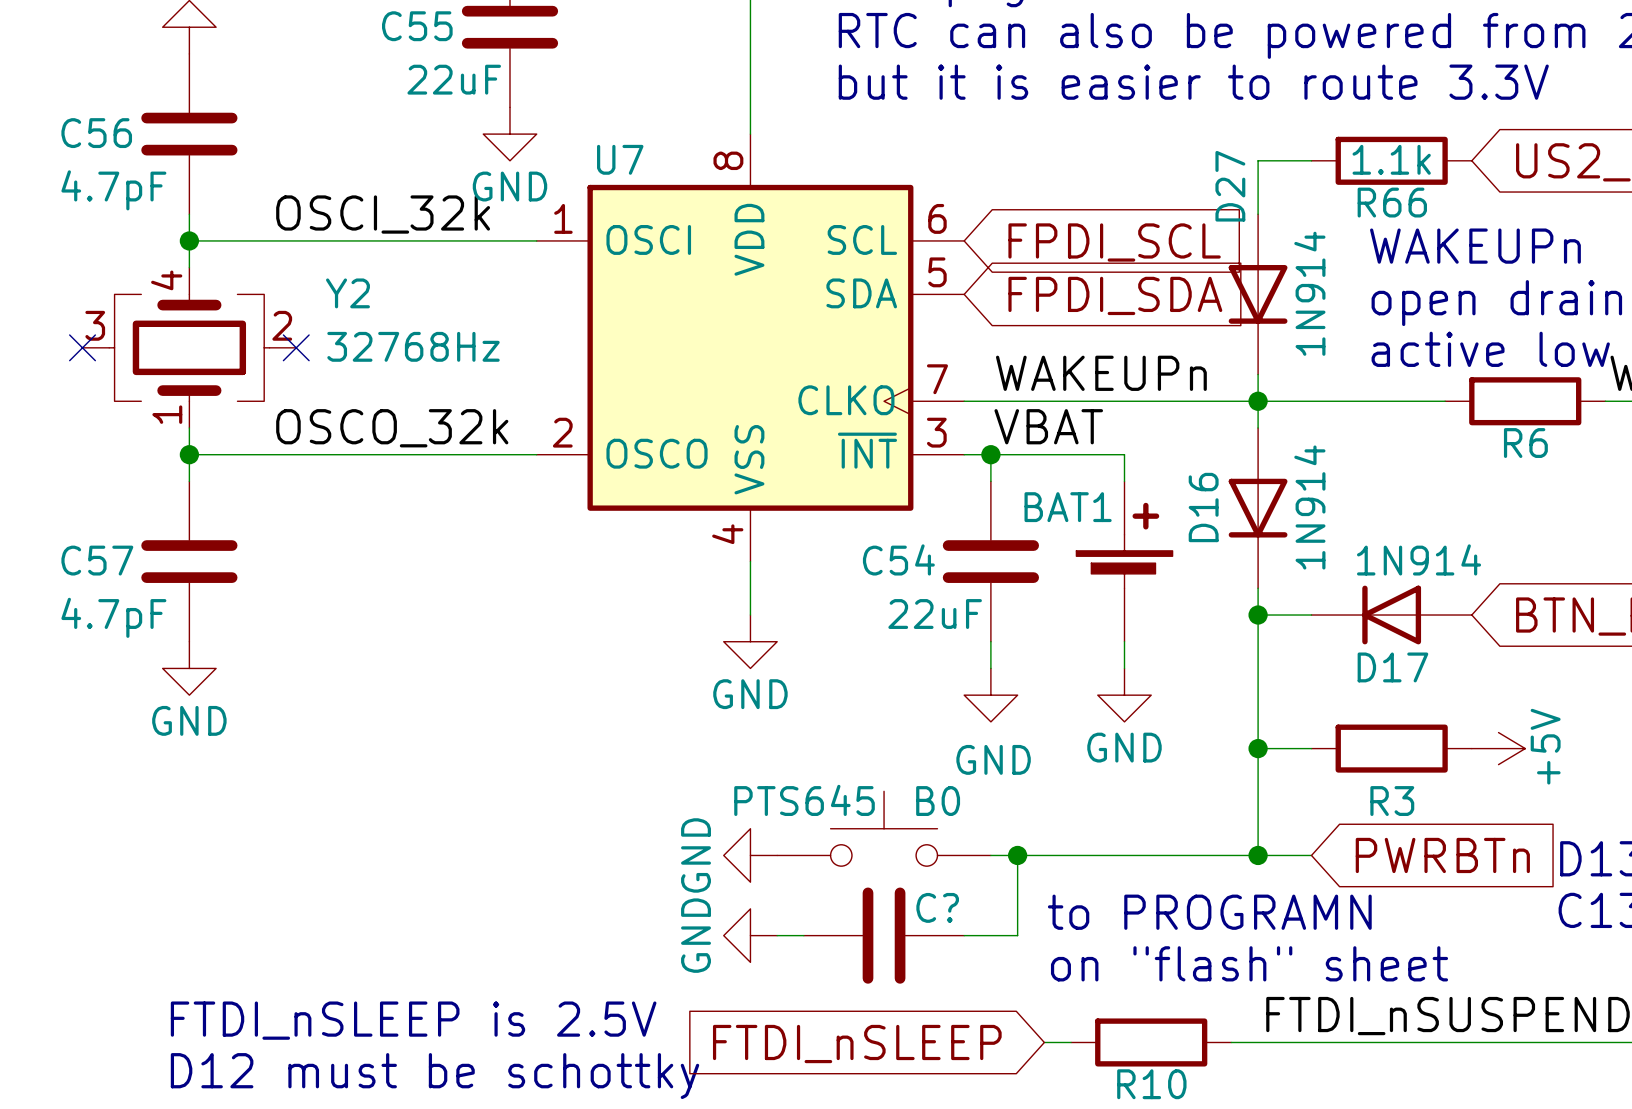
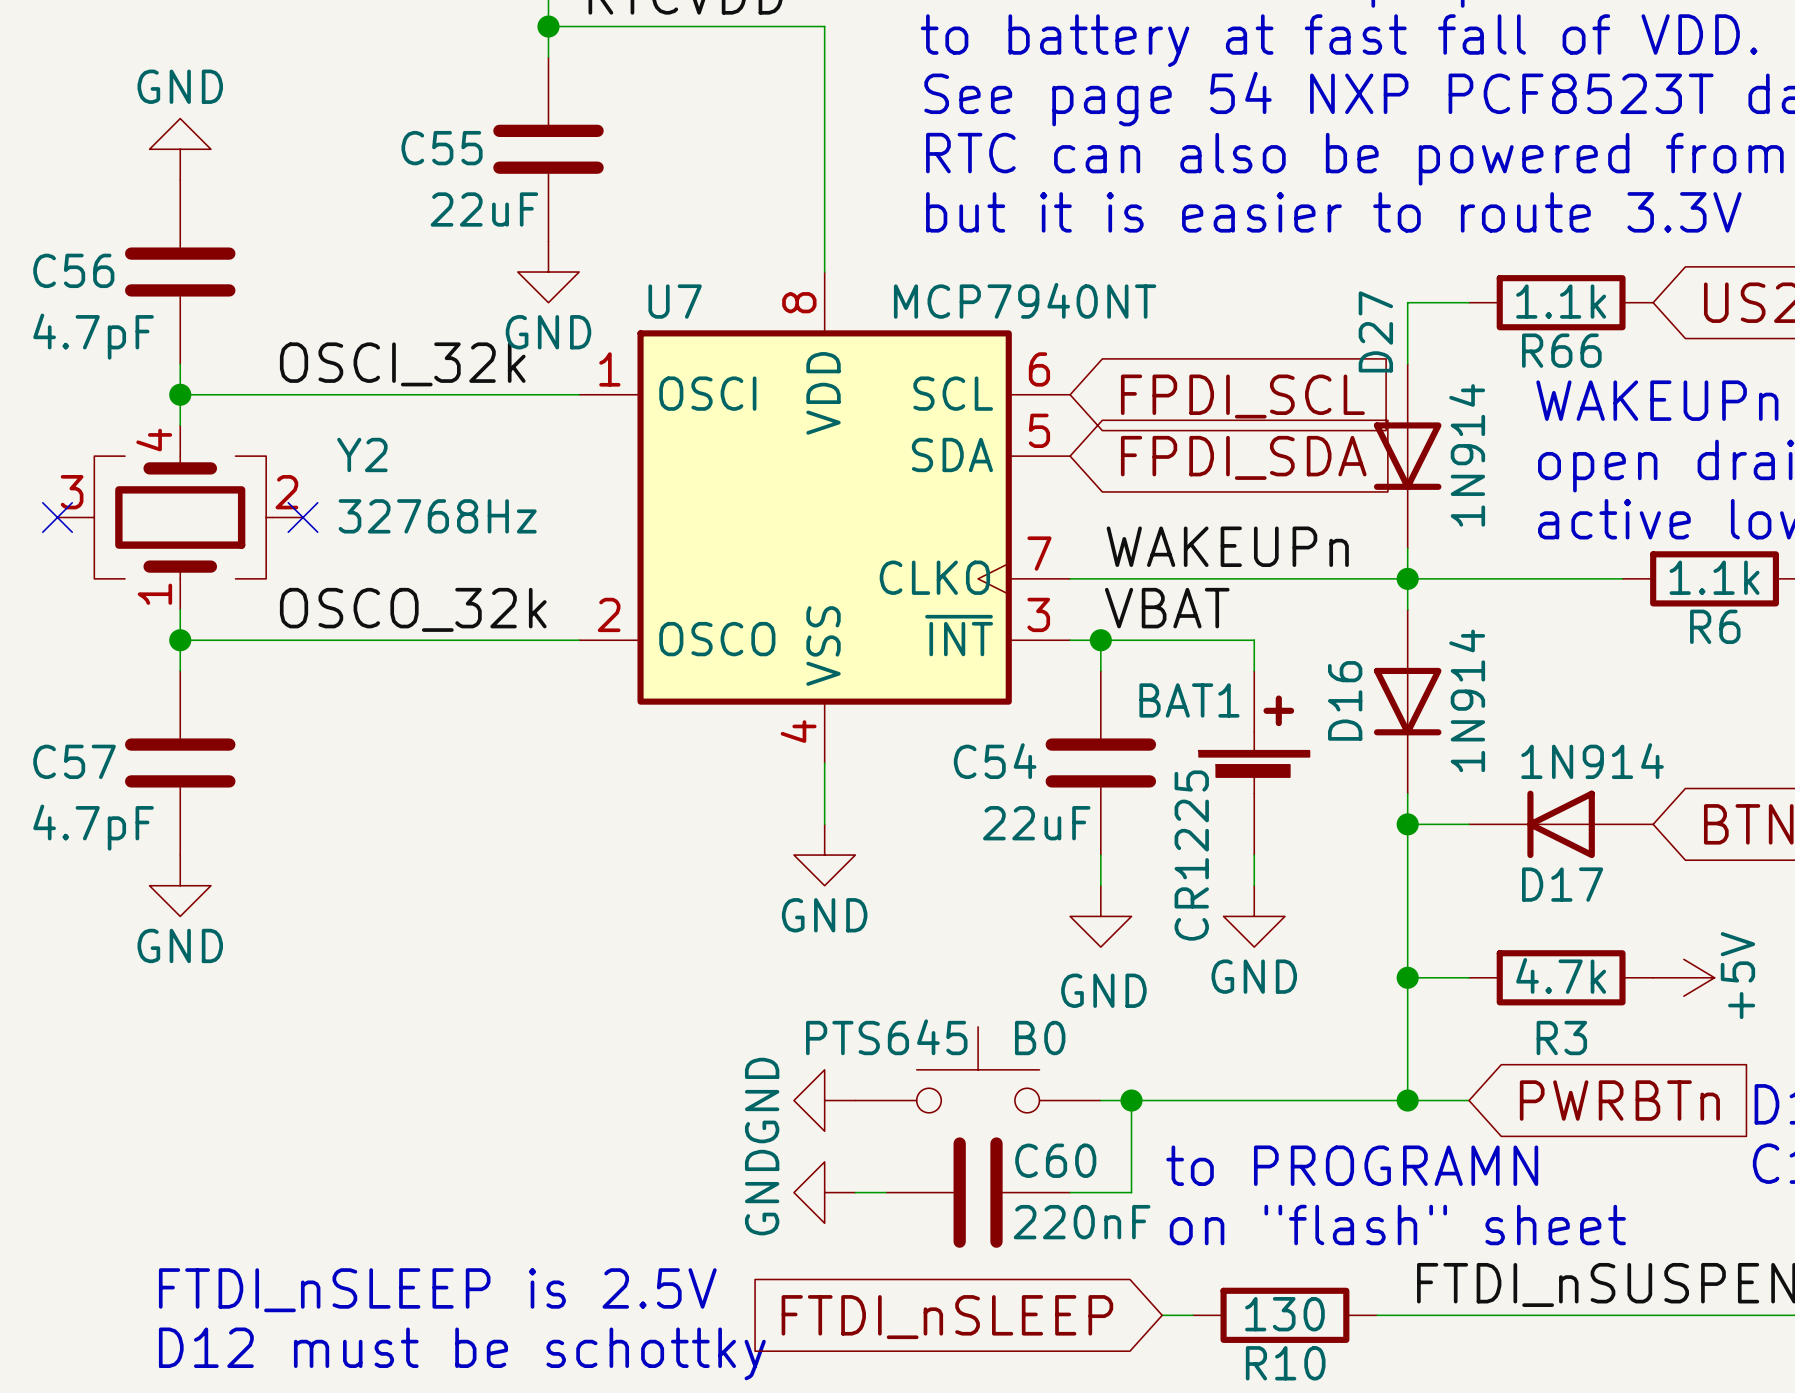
U7 value: none -> MCP7940NT (1025, 300)
R6 value: none -> 1.1k (1714, 577)
BAT1 value: none -> CR1225 (1191, 855)
R3 value: none -> 4.7k (1561, 975)
C? name: C? (937, 907) -> C60 (1055, 1160)
C? value: none -> 220nF (1082, 1222)
R10 value: none -> 130 (1284, 1314)

